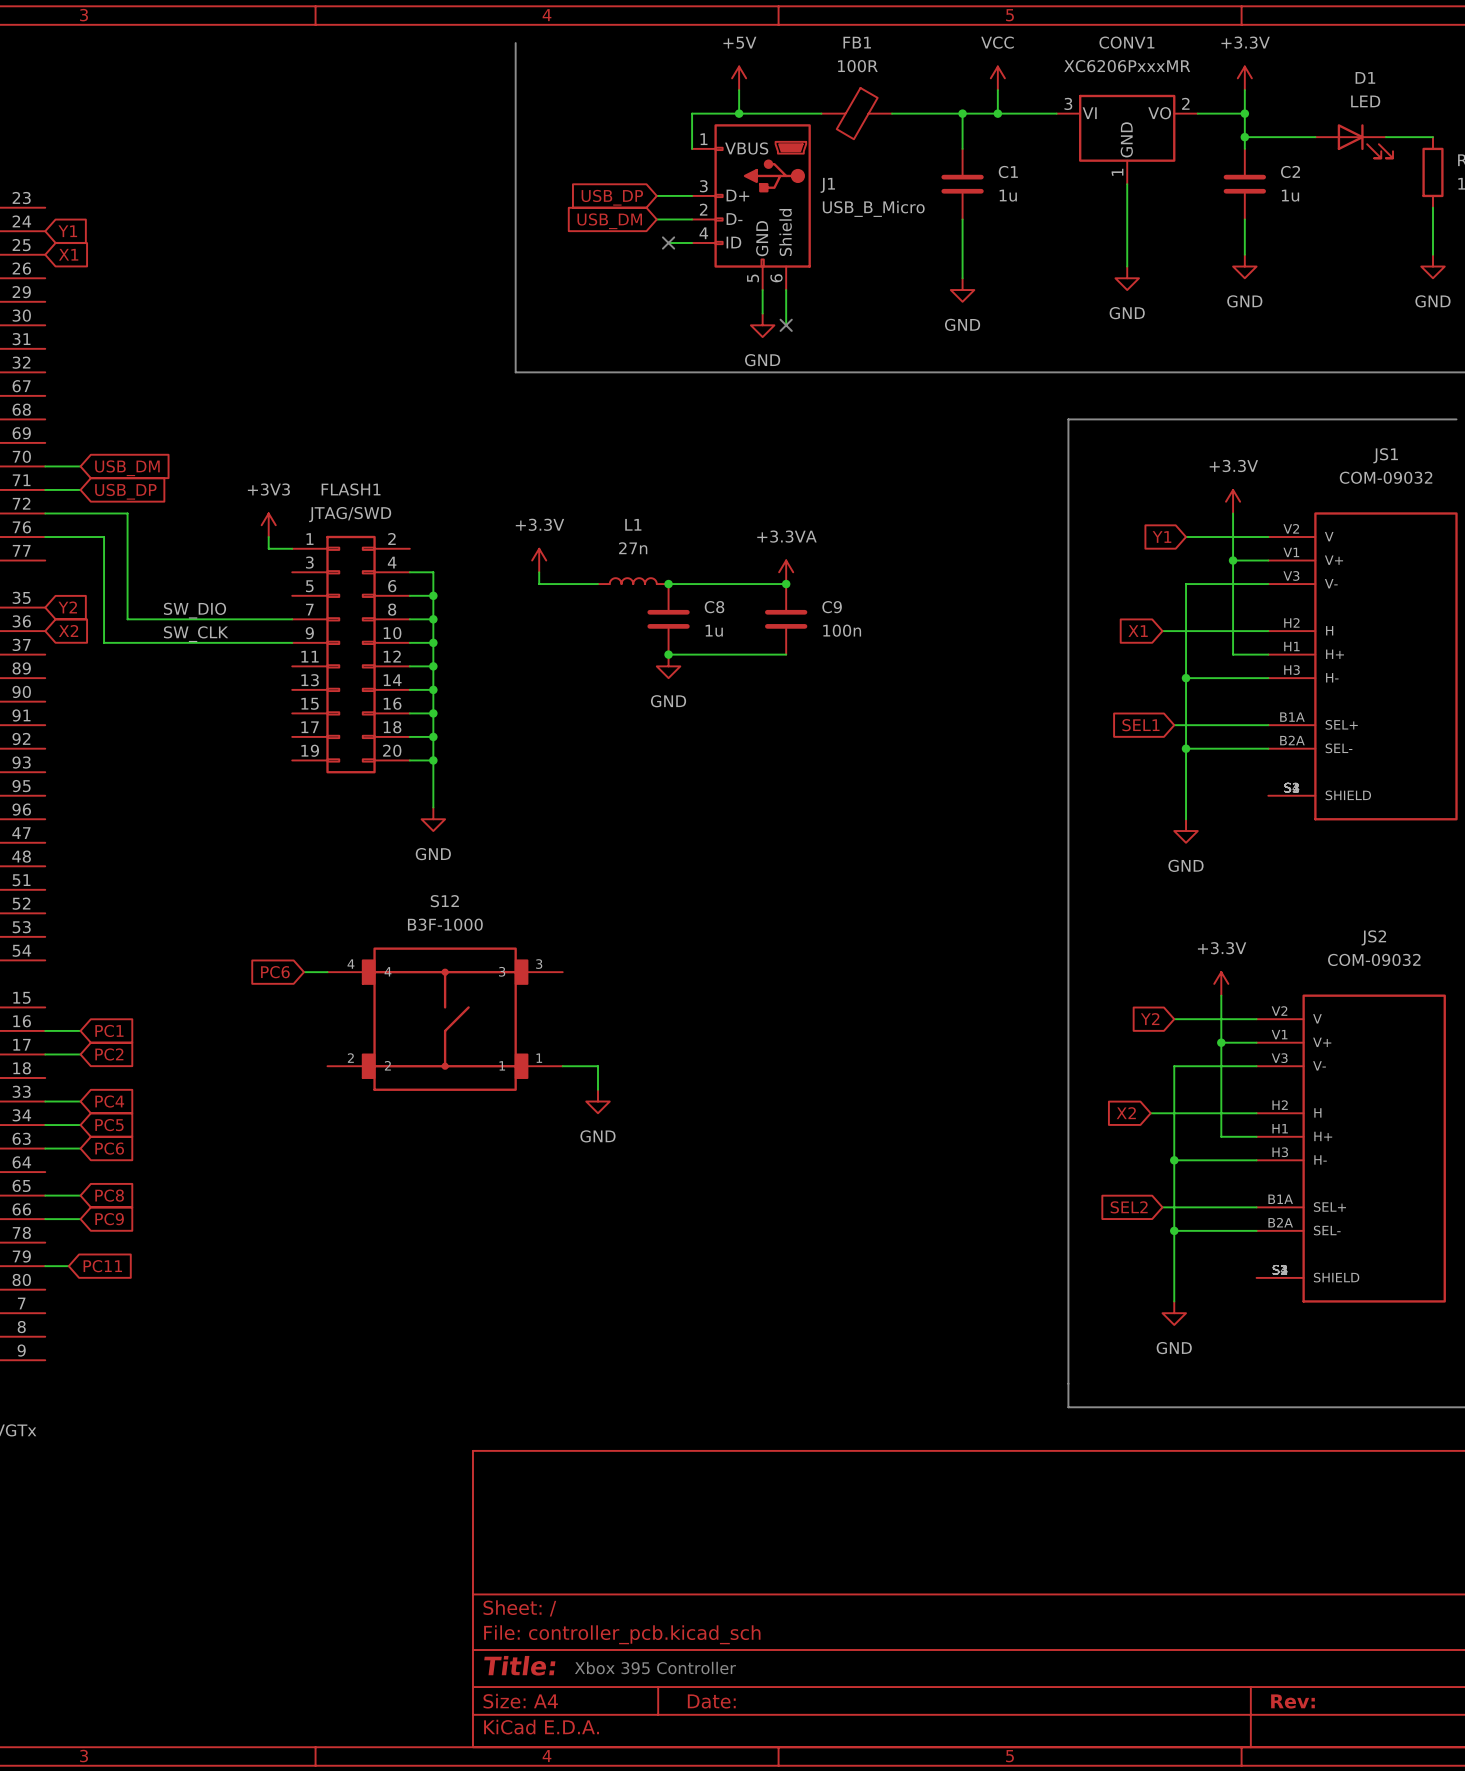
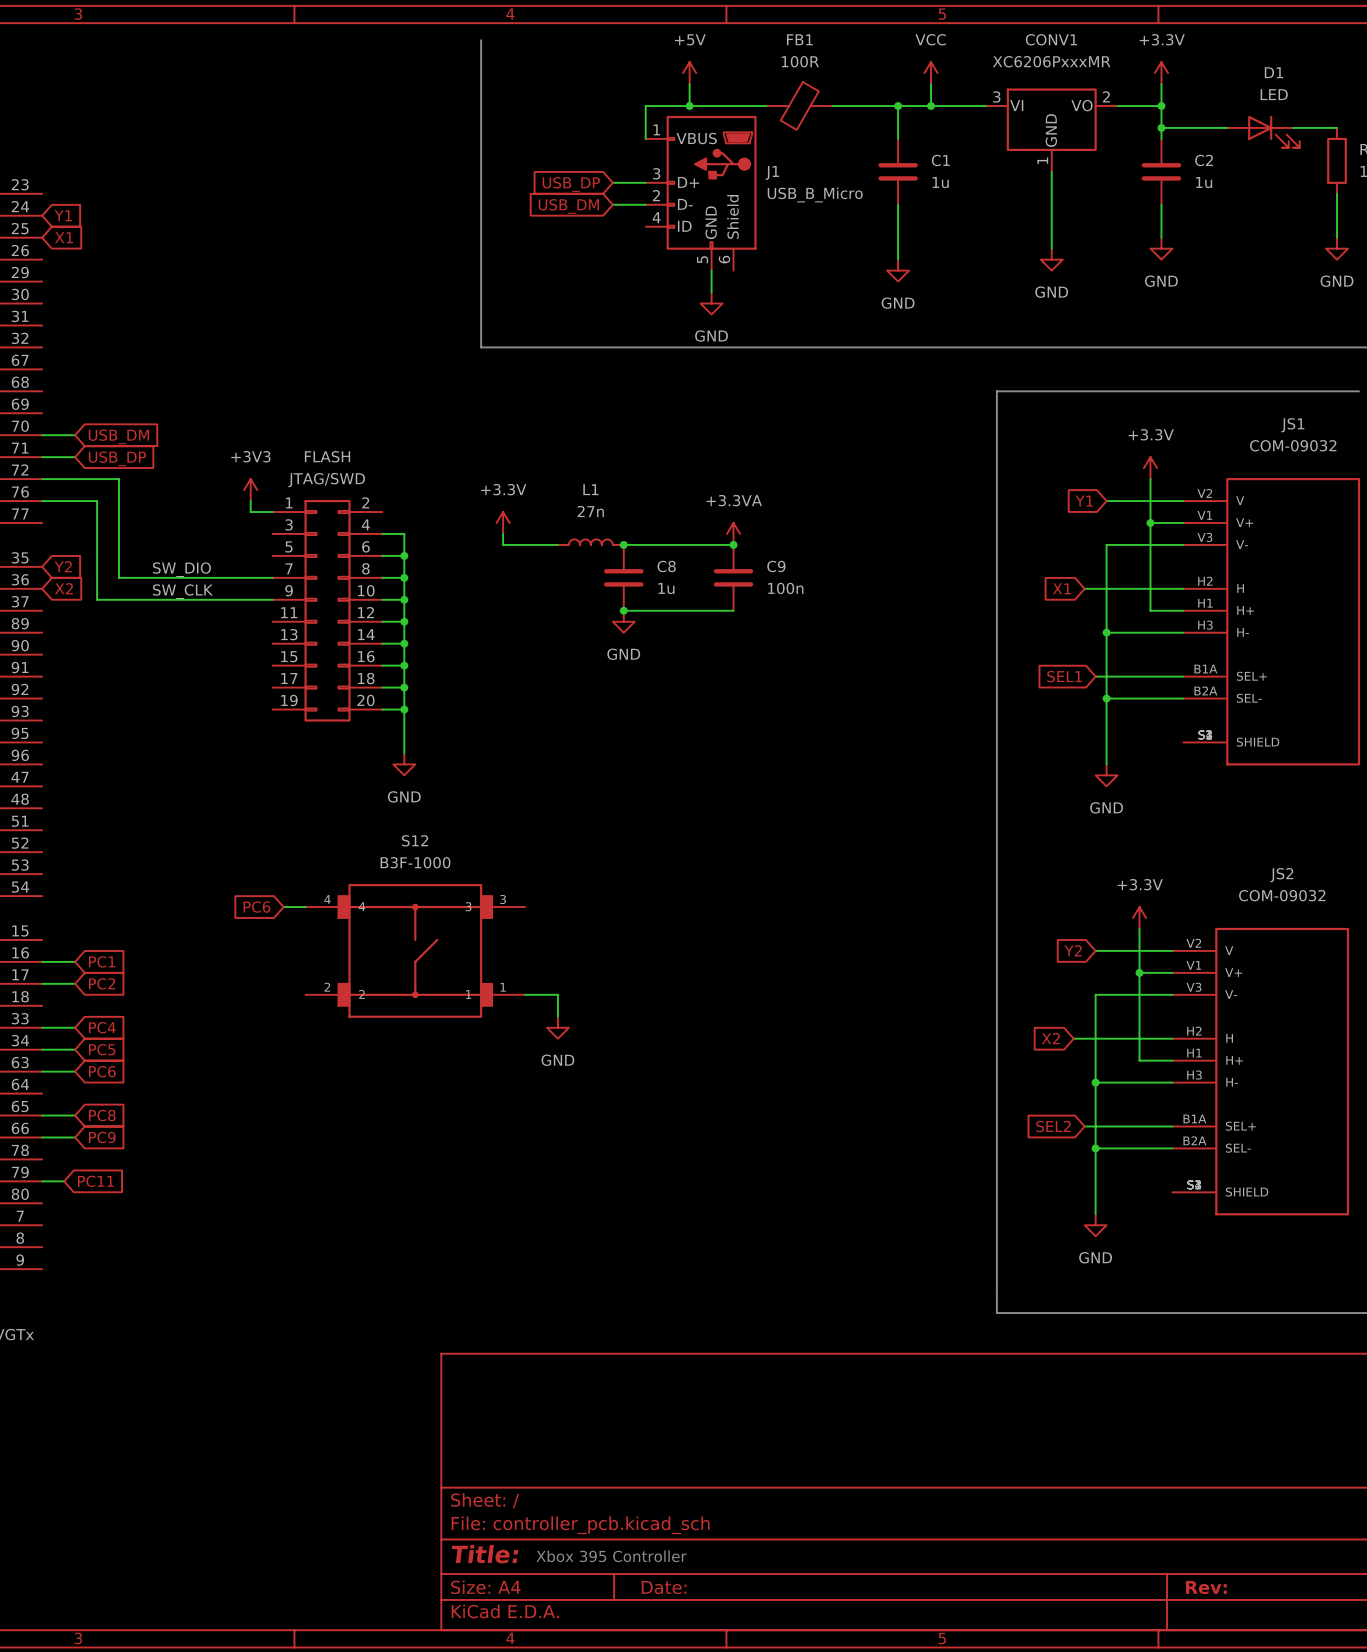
wire: (668, 242) (692, 242) -> none
no-connect mark: (668, 242) -> none
wire: (786, 290) (786, 325) -> none
no-connect mark: (786, 325) -> none
FLASH1 name: FLASH1 (351, 489) -> FLASH (327, 456)

